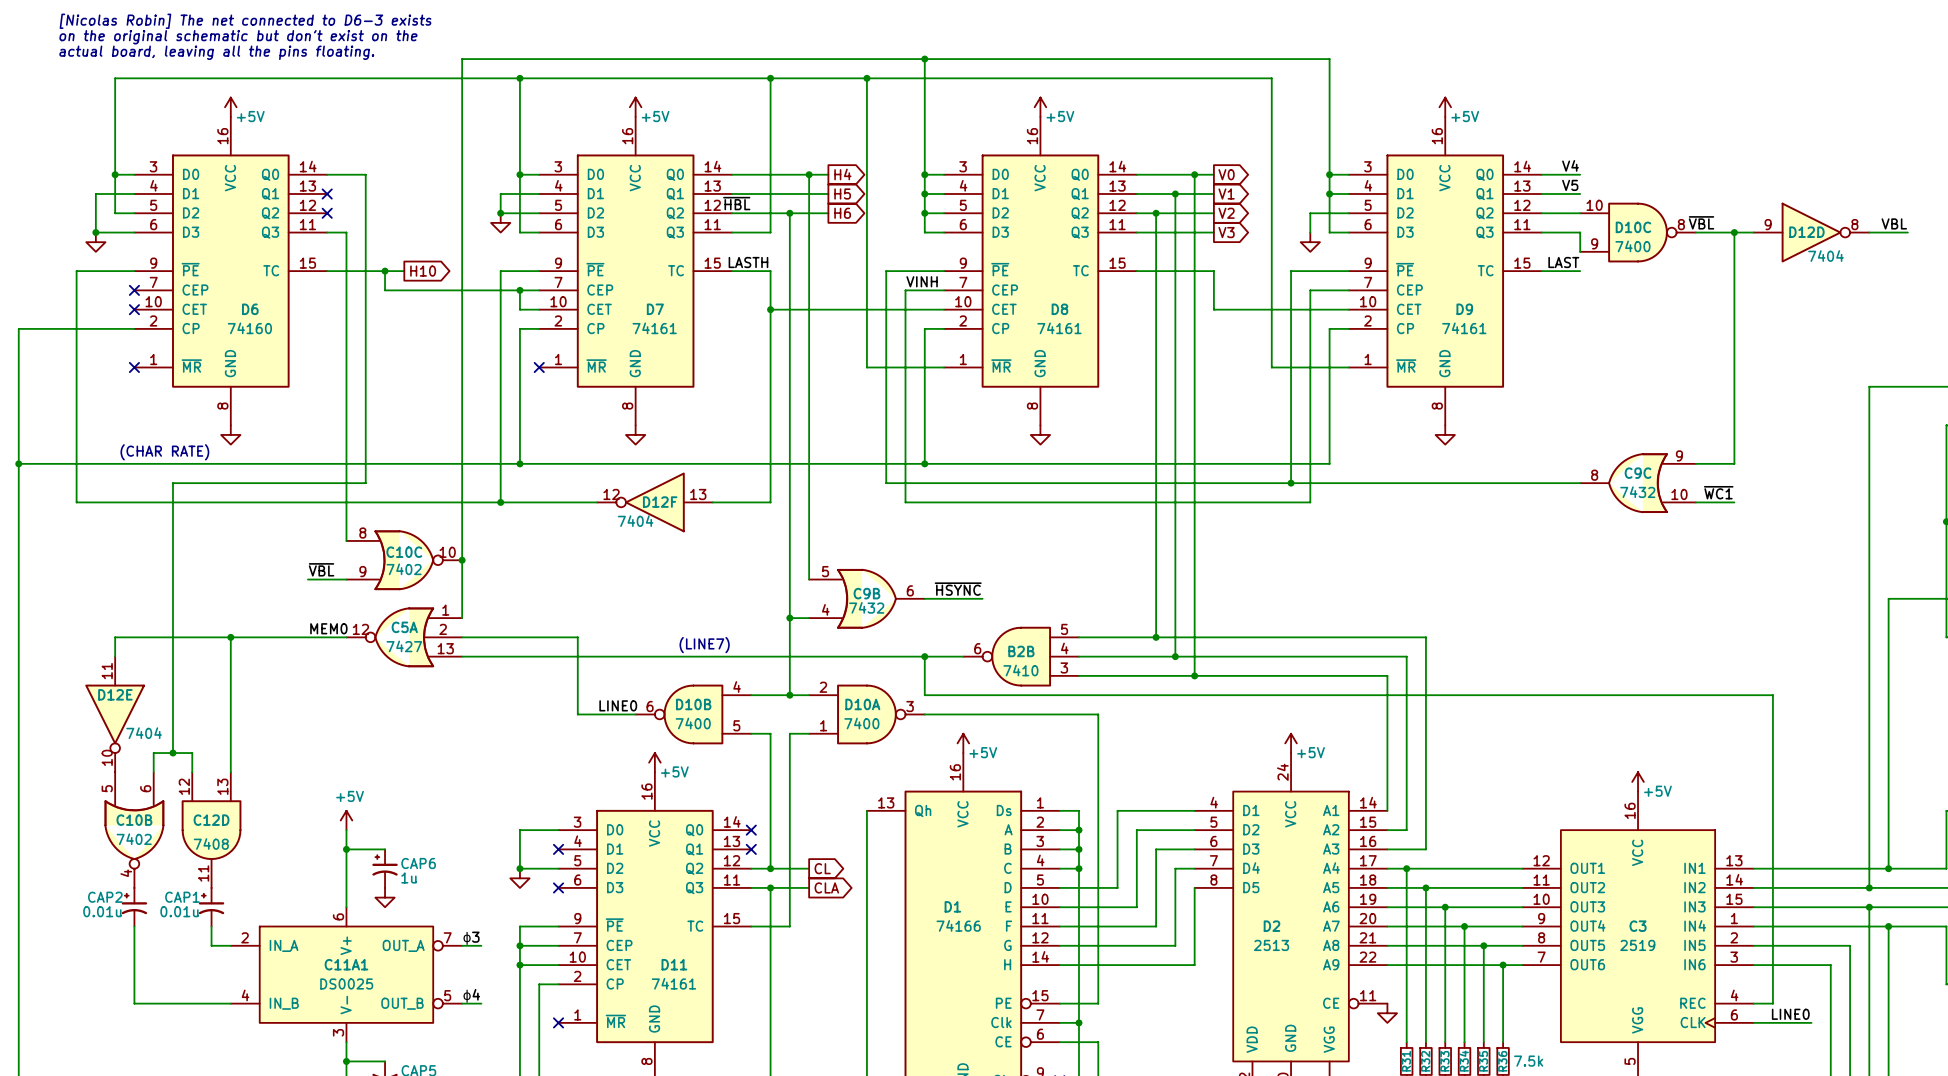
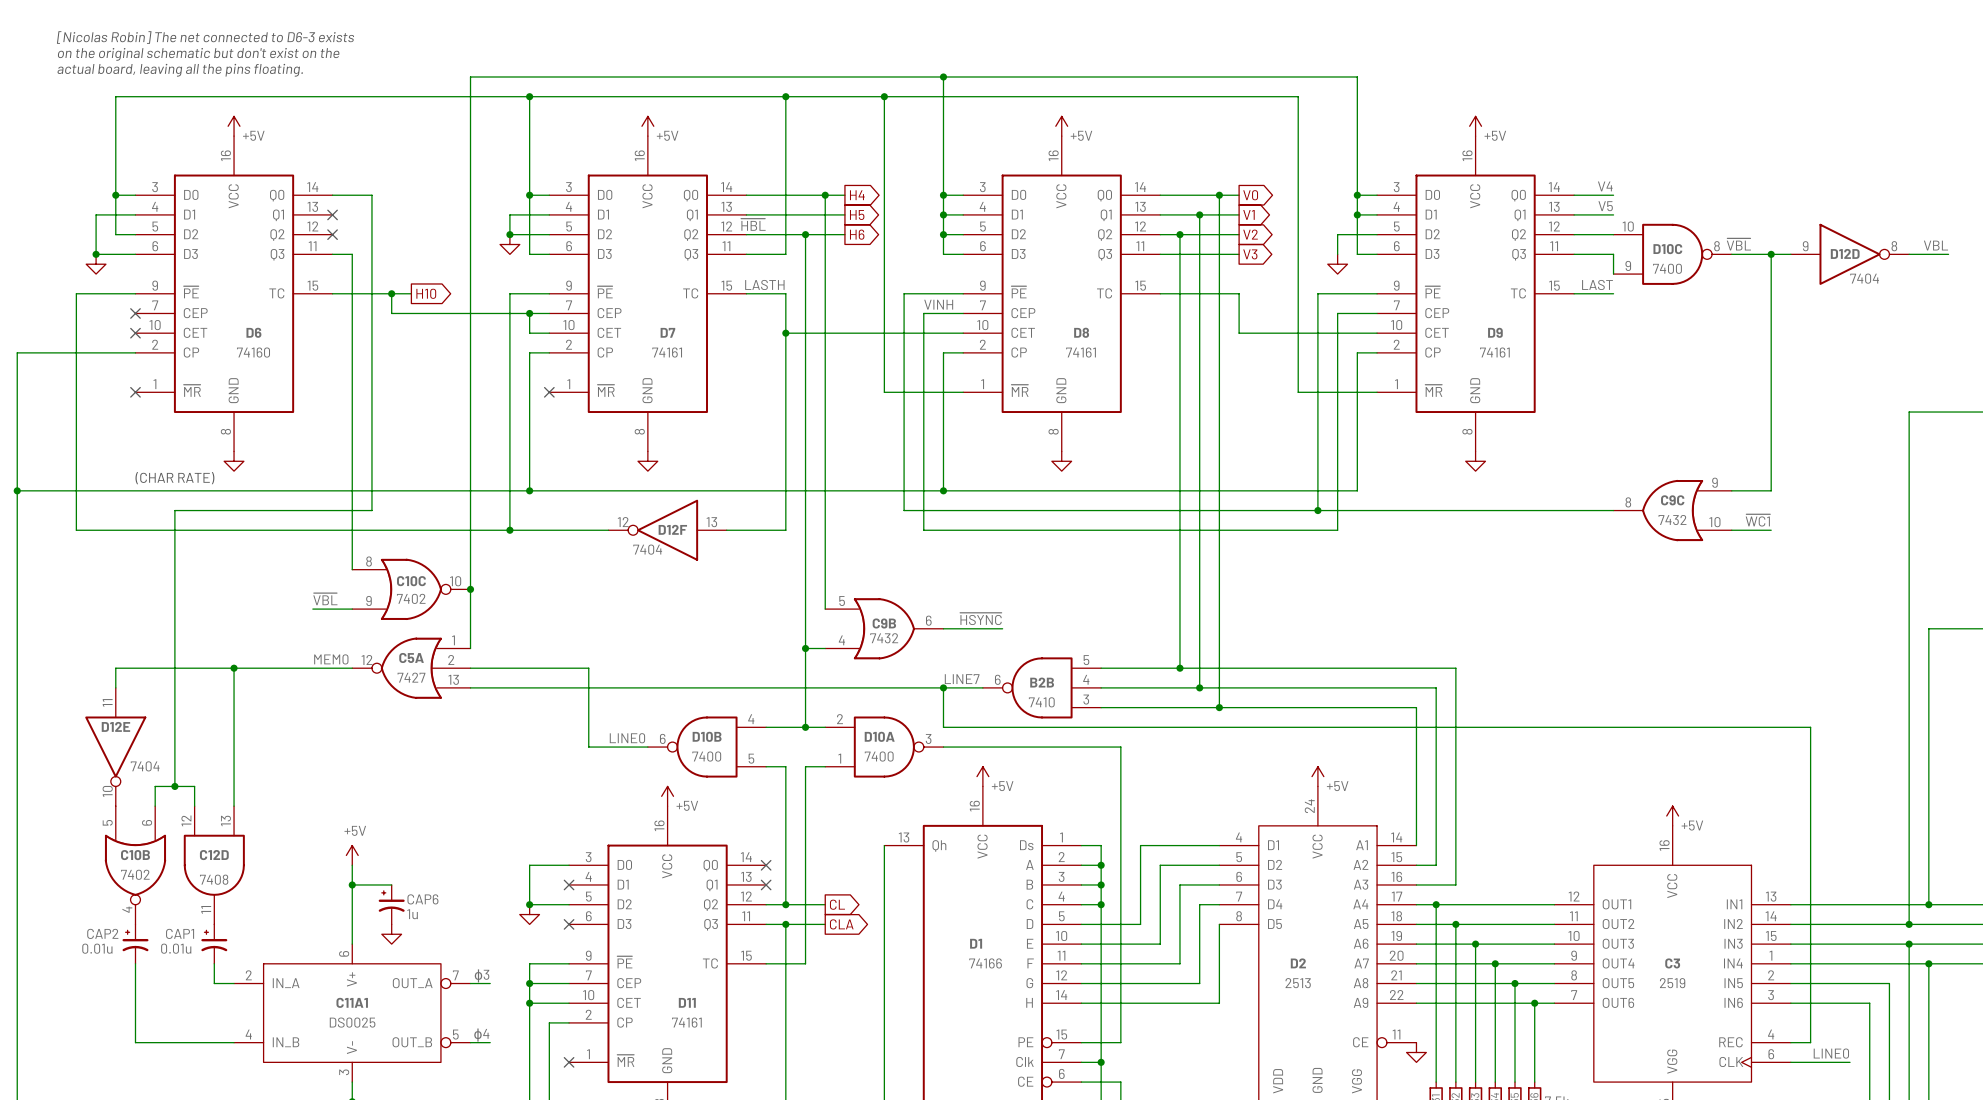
text: (LINE7) (704, 645) -> none
label: none -> LINE7 (962, 679)

